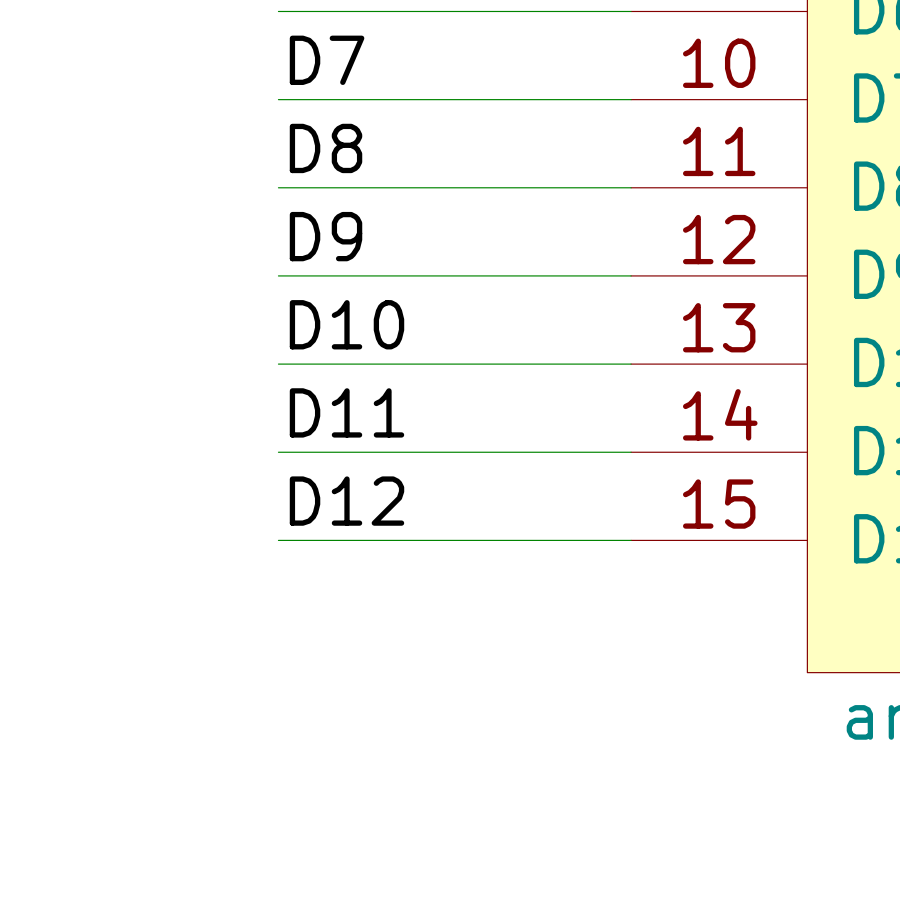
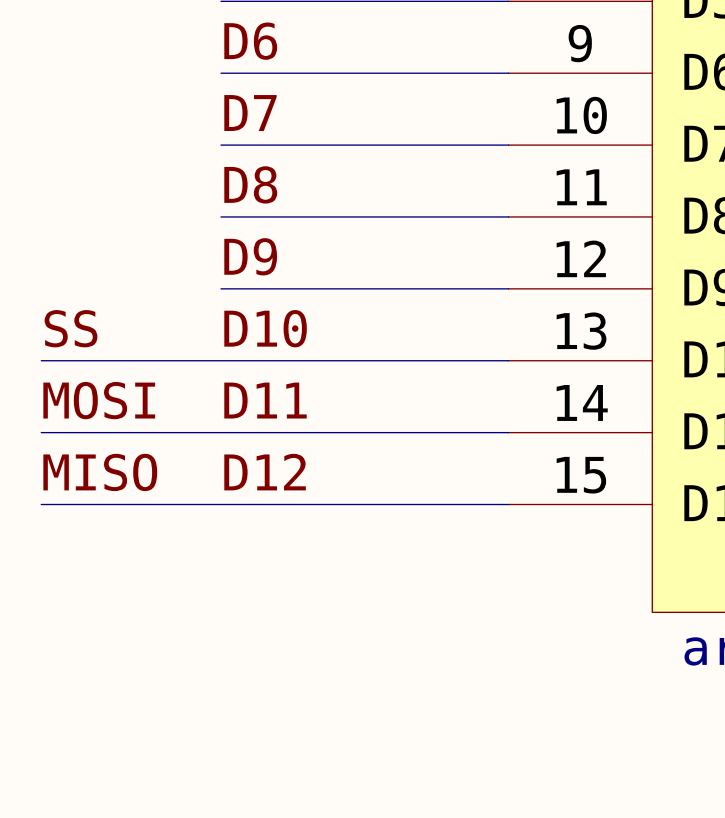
label: none -> SS (71, 328)
wire: none -> (41, 360) (221, 360)
label: none -> MOSI (99, 400)
wire: none -> (41, 432) (221, 432)
label: none -> MISO (100, 472)
wire: none -> (41, 504) (221, 504)

